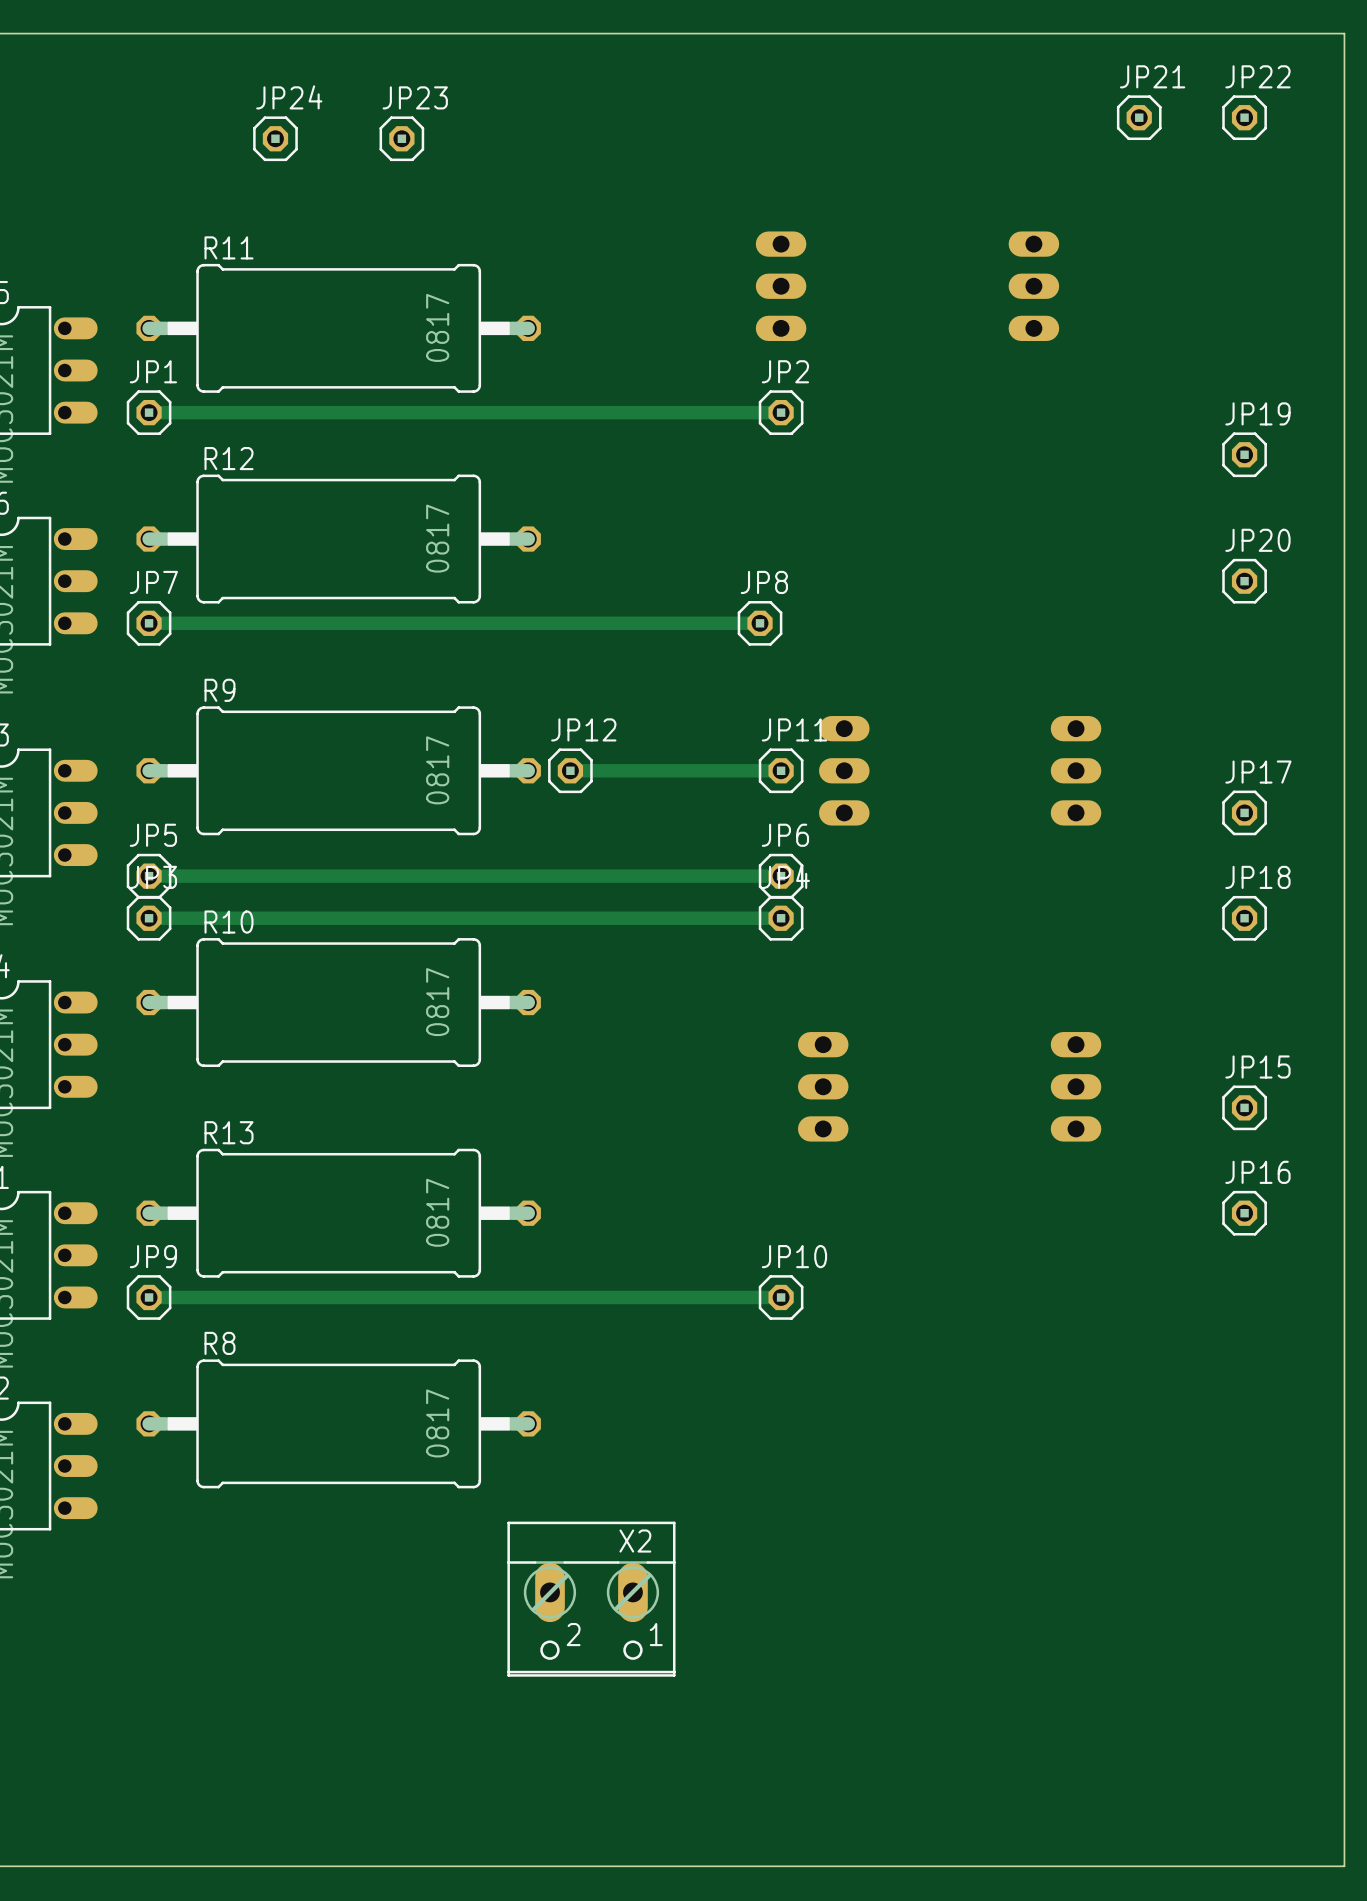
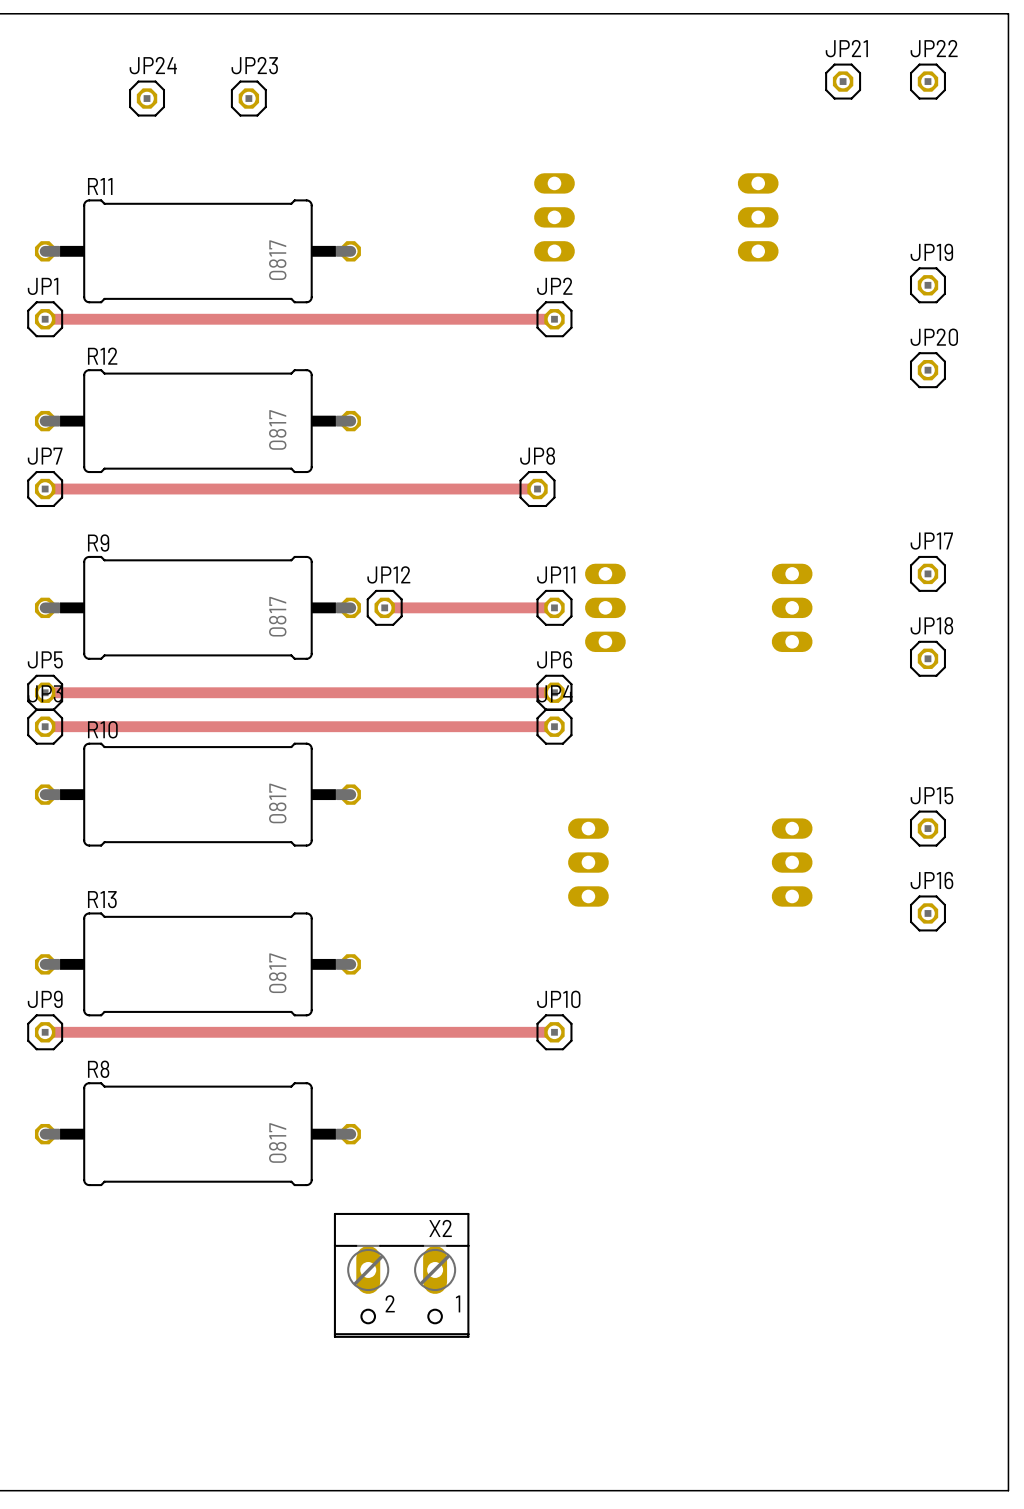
JP19 position: (1244, 454) -> (927, 285)
JP20 position: (1244, 581) -> (927, 370)
JP17 position: (1244, 812) -> (927, 573)
JP18 position: (1244, 918) -> (927, 658)
JP15 position: (1244, 1107) -> (927, 828)
JP16 position: (1244, 1213) -> (927, 913)

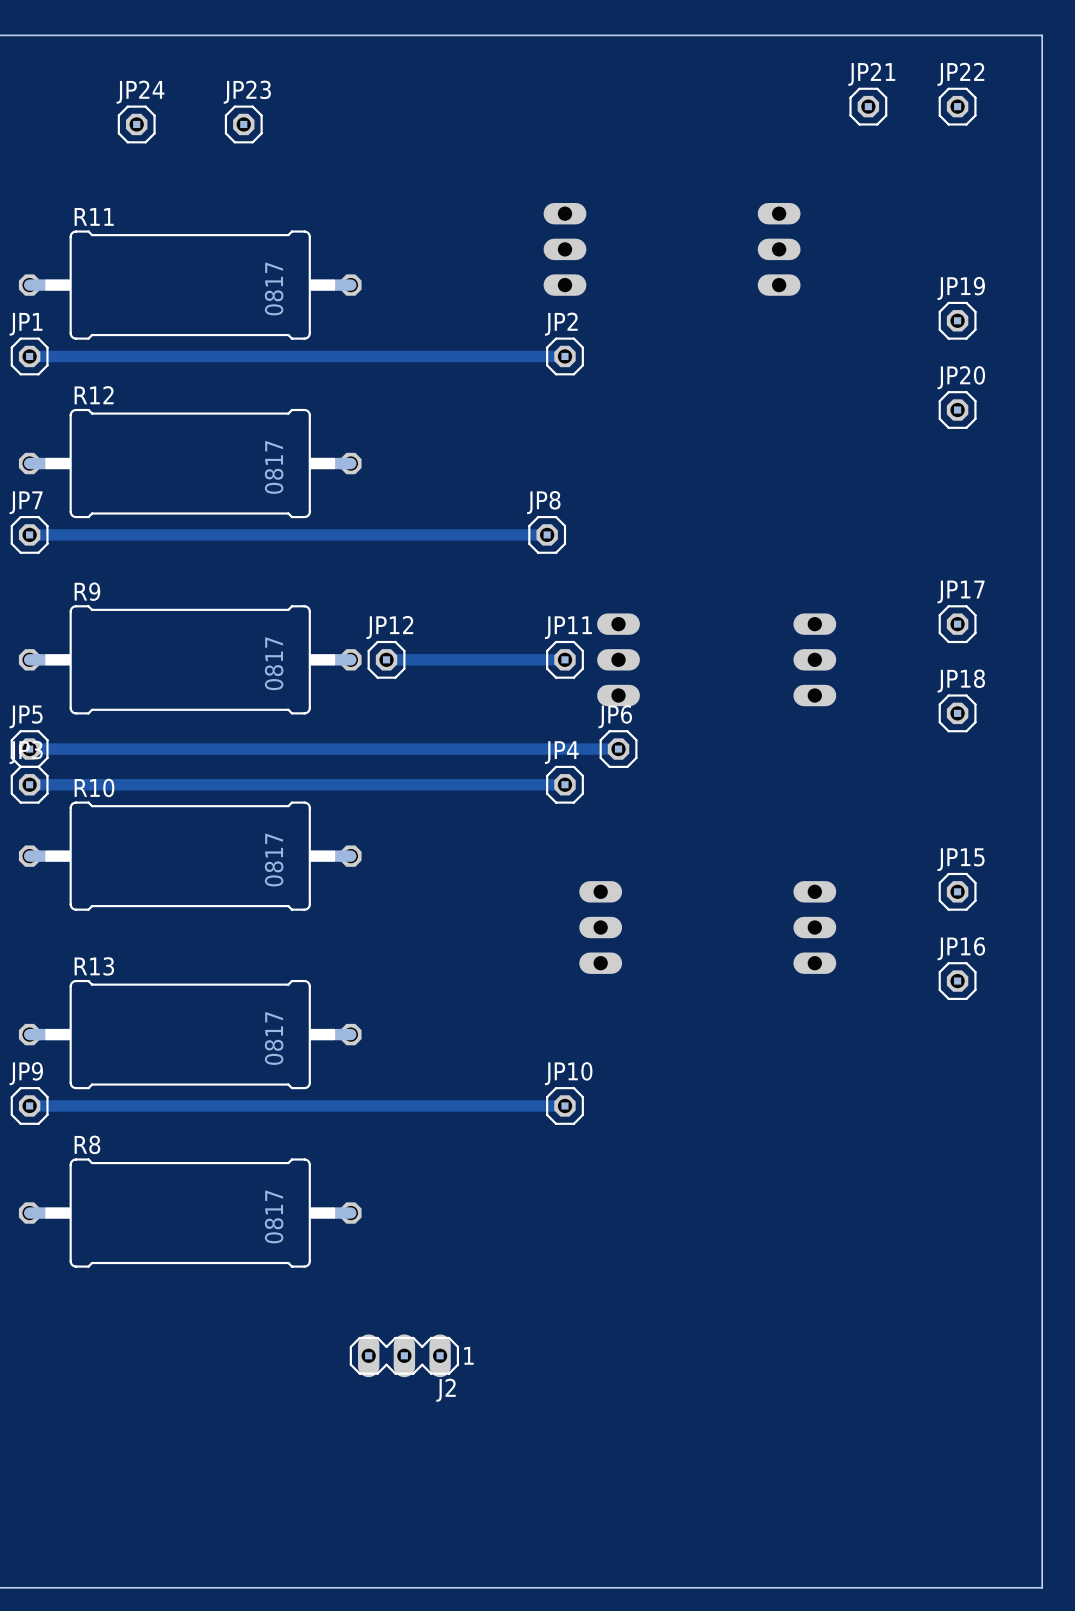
track: none -> (564, 749) (618, 749)
JP6 position: (554, 692) -> (618, 749)
J2: none -> (404, 1355)
X2: (401, 1275) -> none

